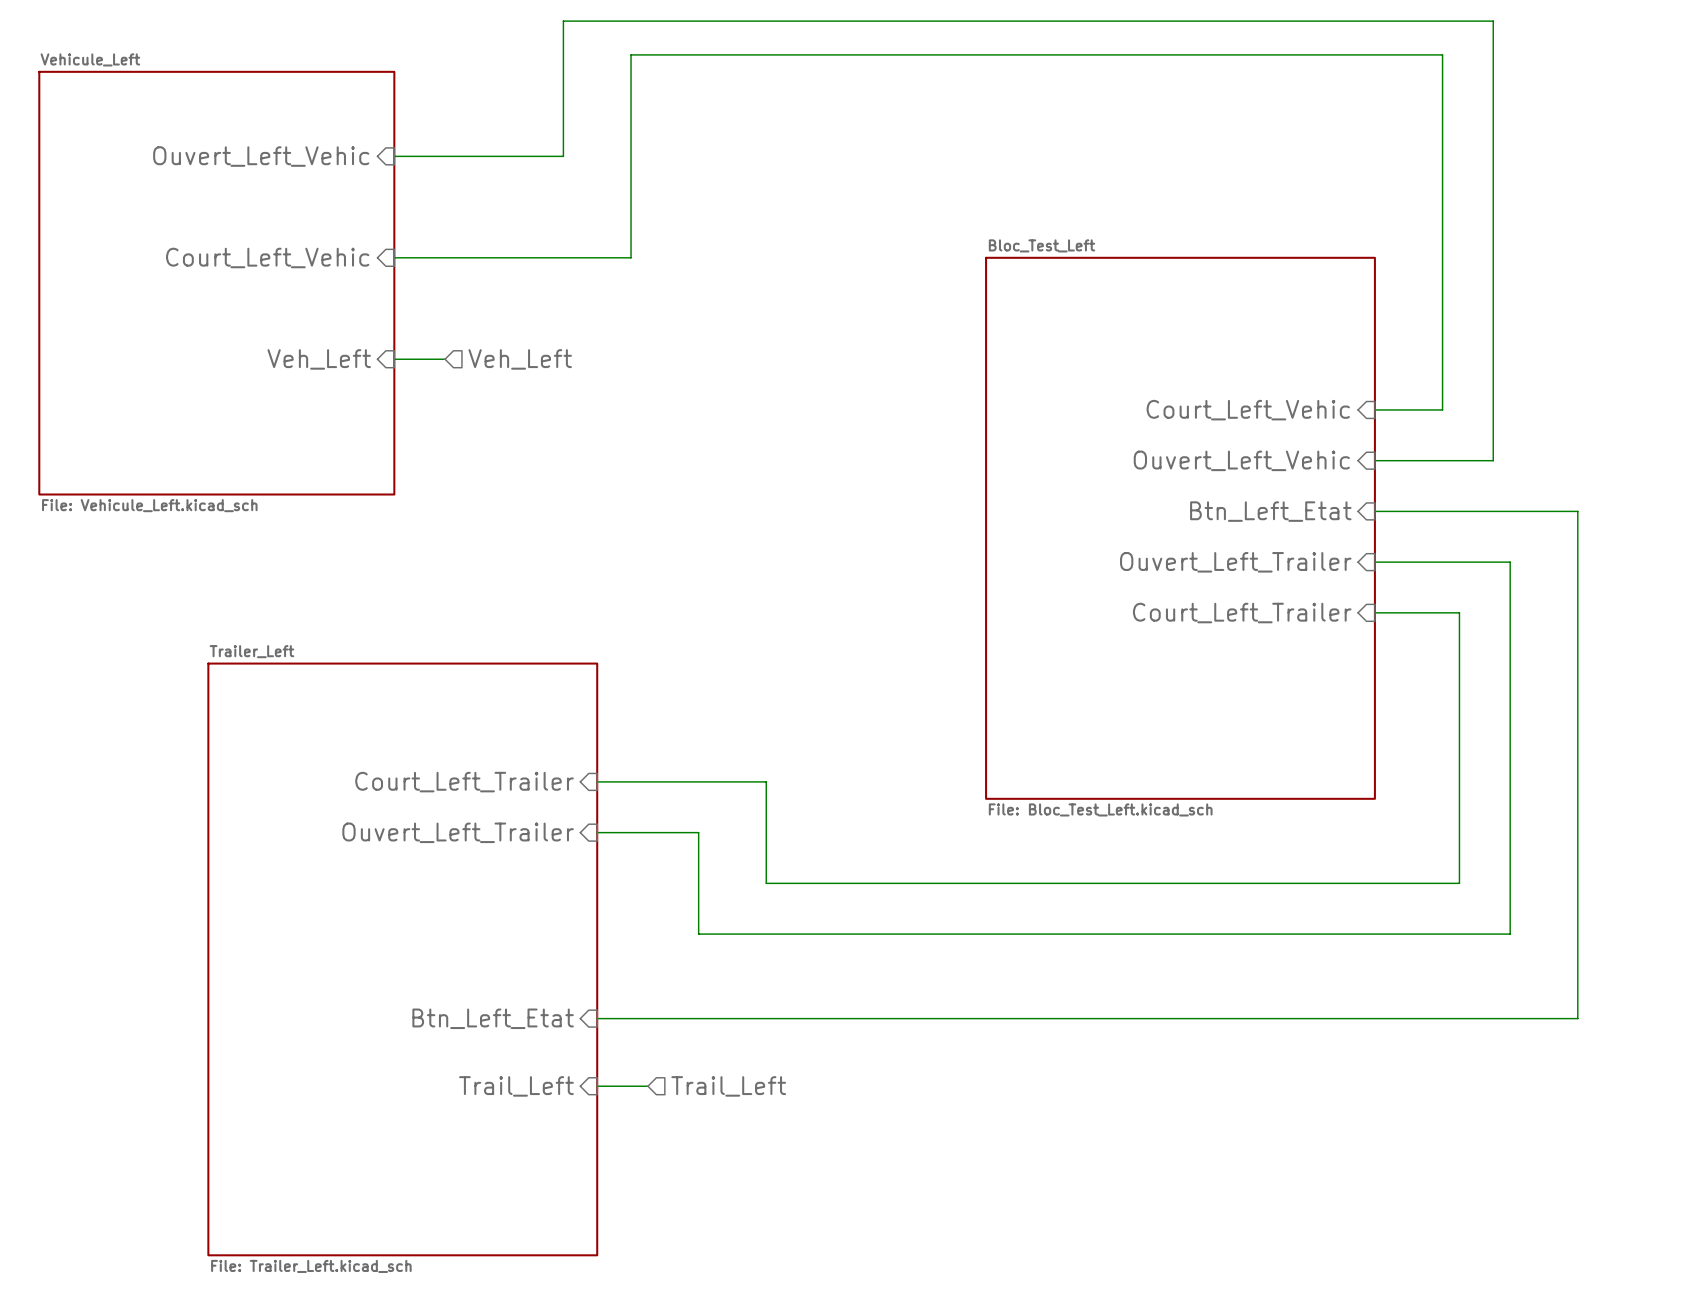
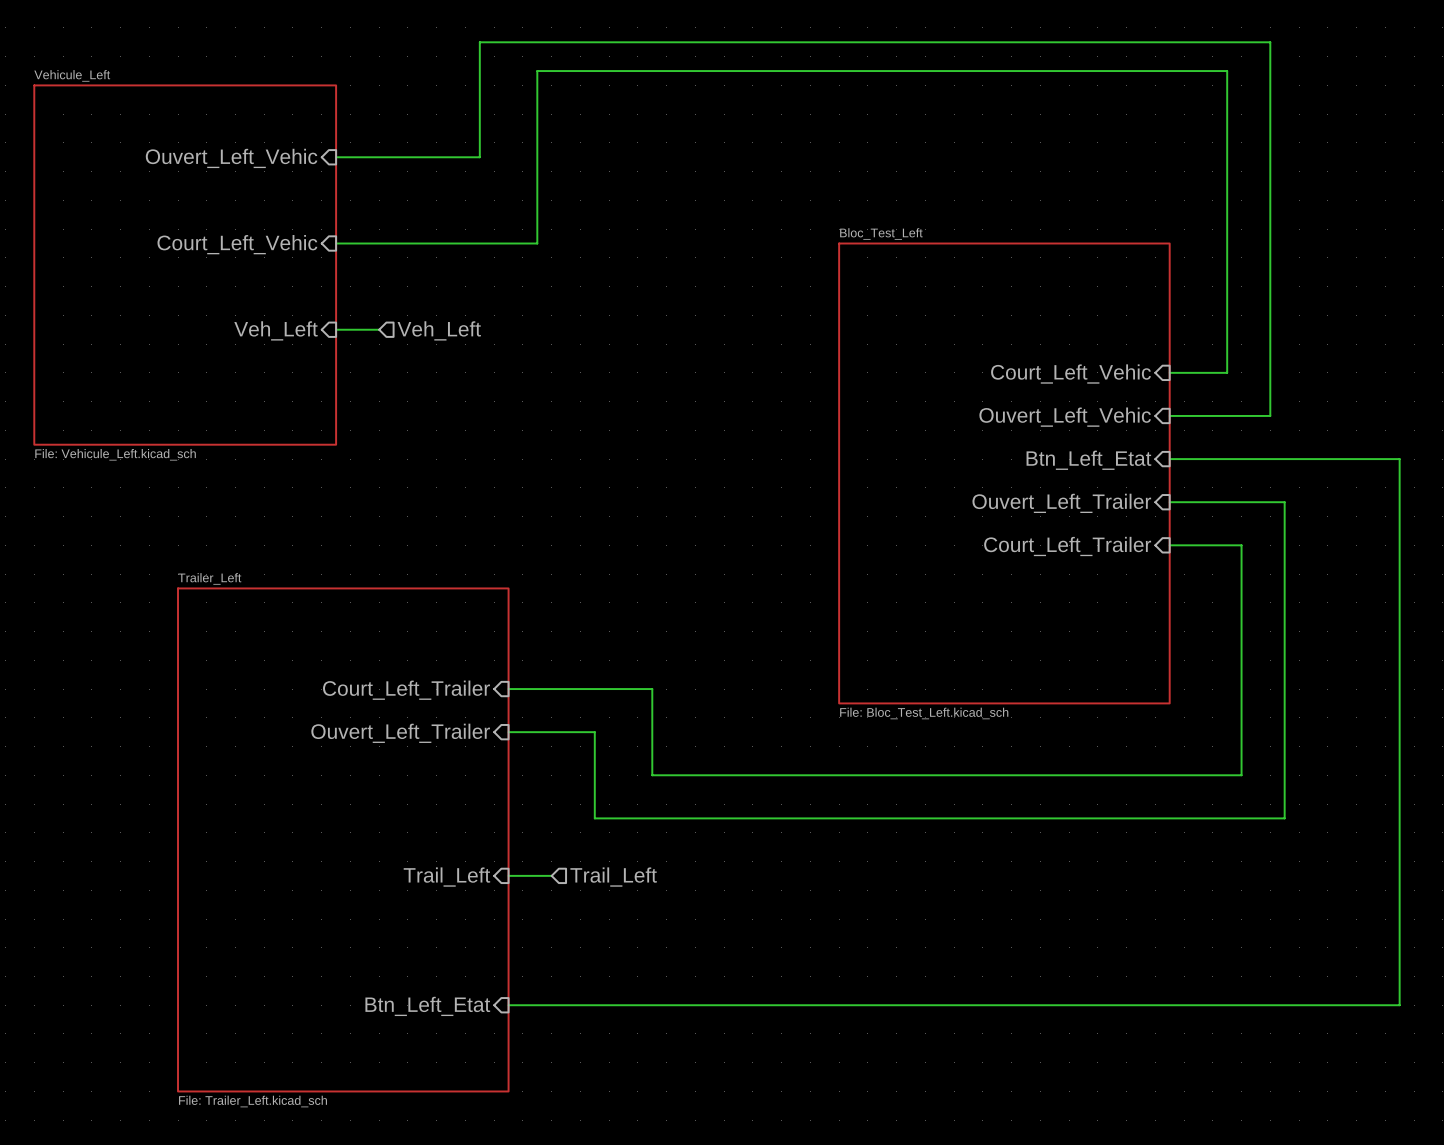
wire: (1577, 511) (1577, 1018) (597, 1018) -> (1342, 459) (1399, 459) (1399, 1005) (508, 1005)
sheet pin position: Btn_Left_Etat (493, 1018) -> Btn_Left_Etat (427, 1006)
sheet pin position: Trail_Left (516, 1086) -> Trail_Left (446, 877)
wire: (597, 1086) (647, 1086) -> (508, 875) (551, 875)
hierarchical label position: Trail_Left (728, 1086) -> Trail_Left (613, 877)

